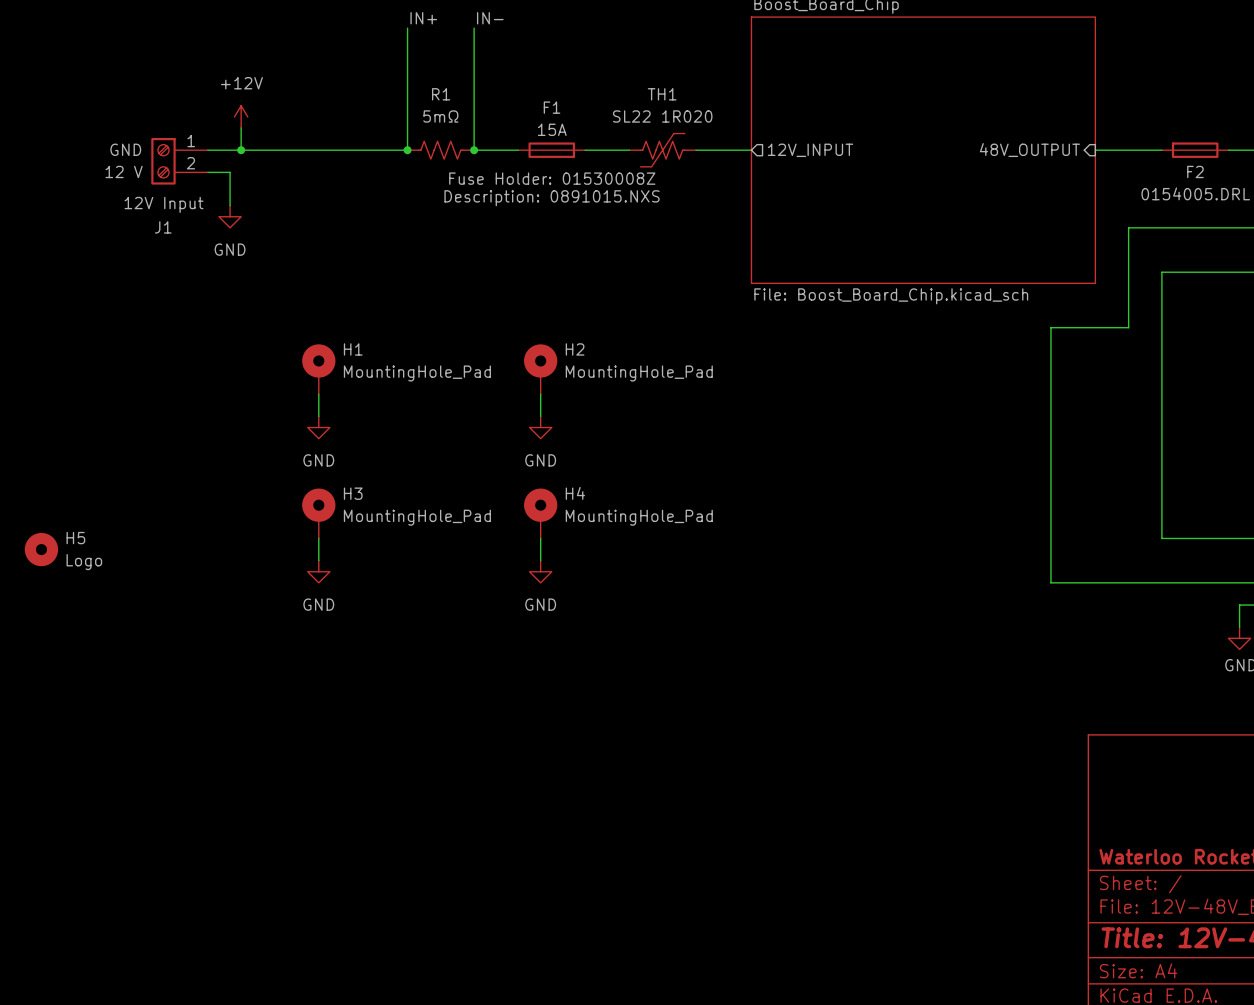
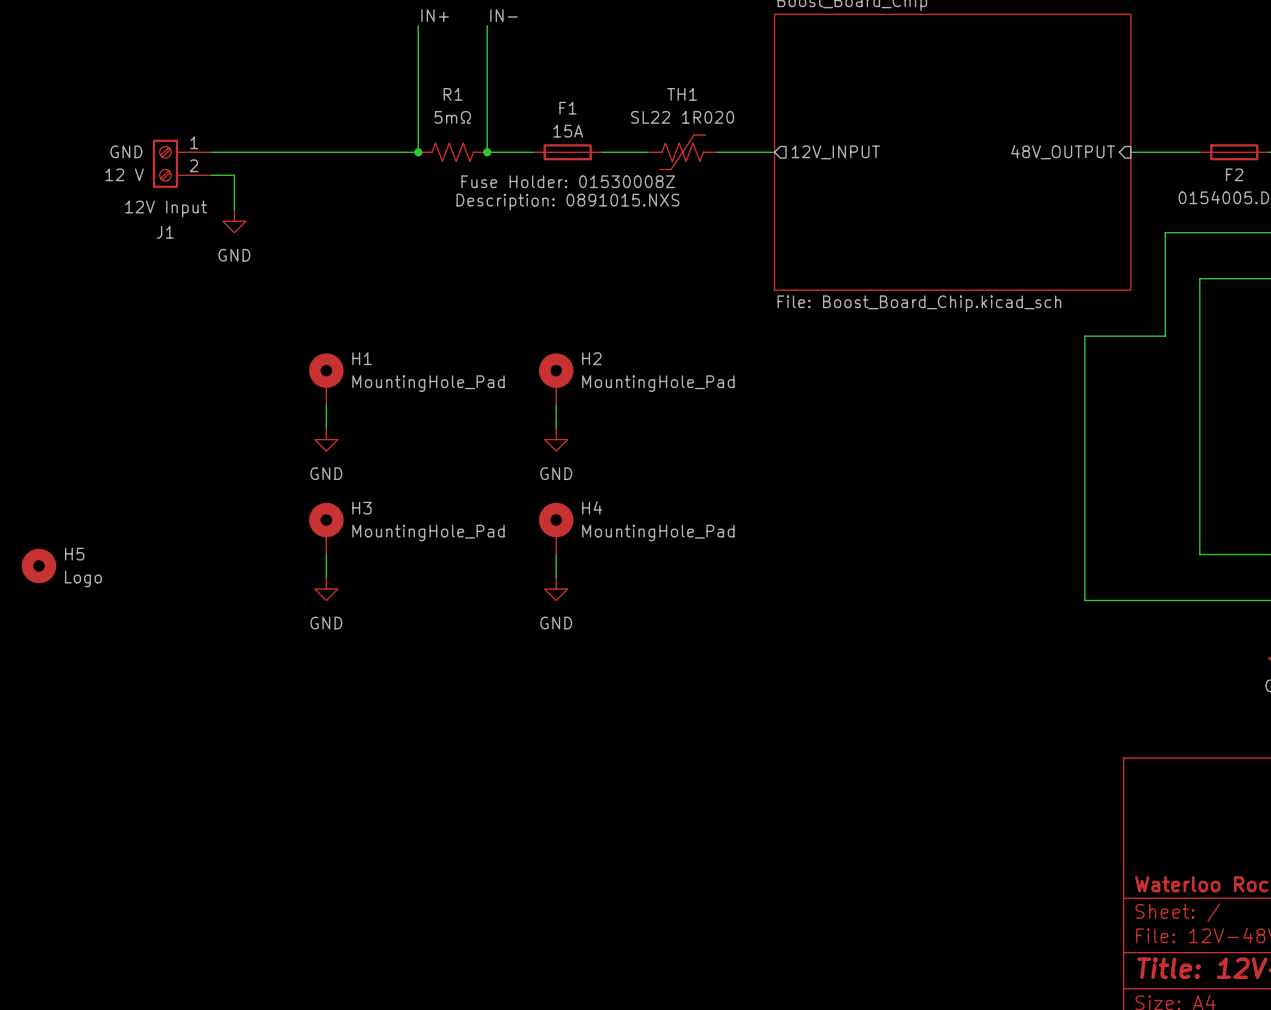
power symbol: +12V (241, 116) -> none
wire: (241, 128) (241, 150) -> none
junction: (241, 150) -> none

